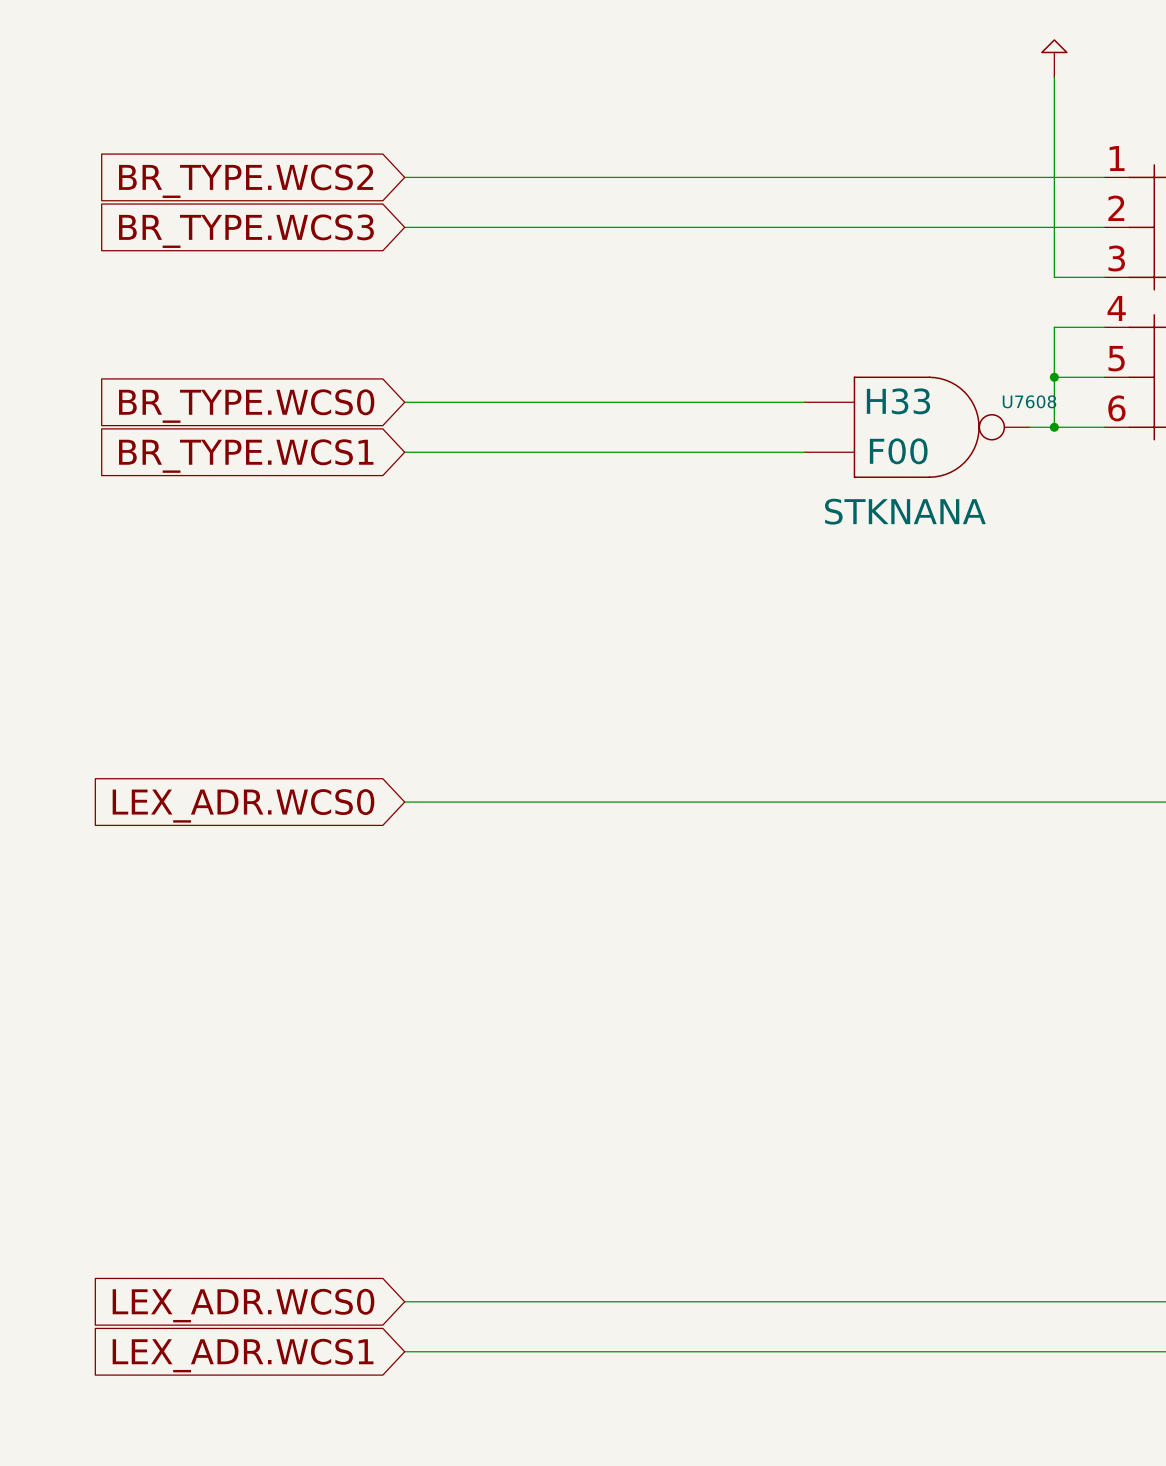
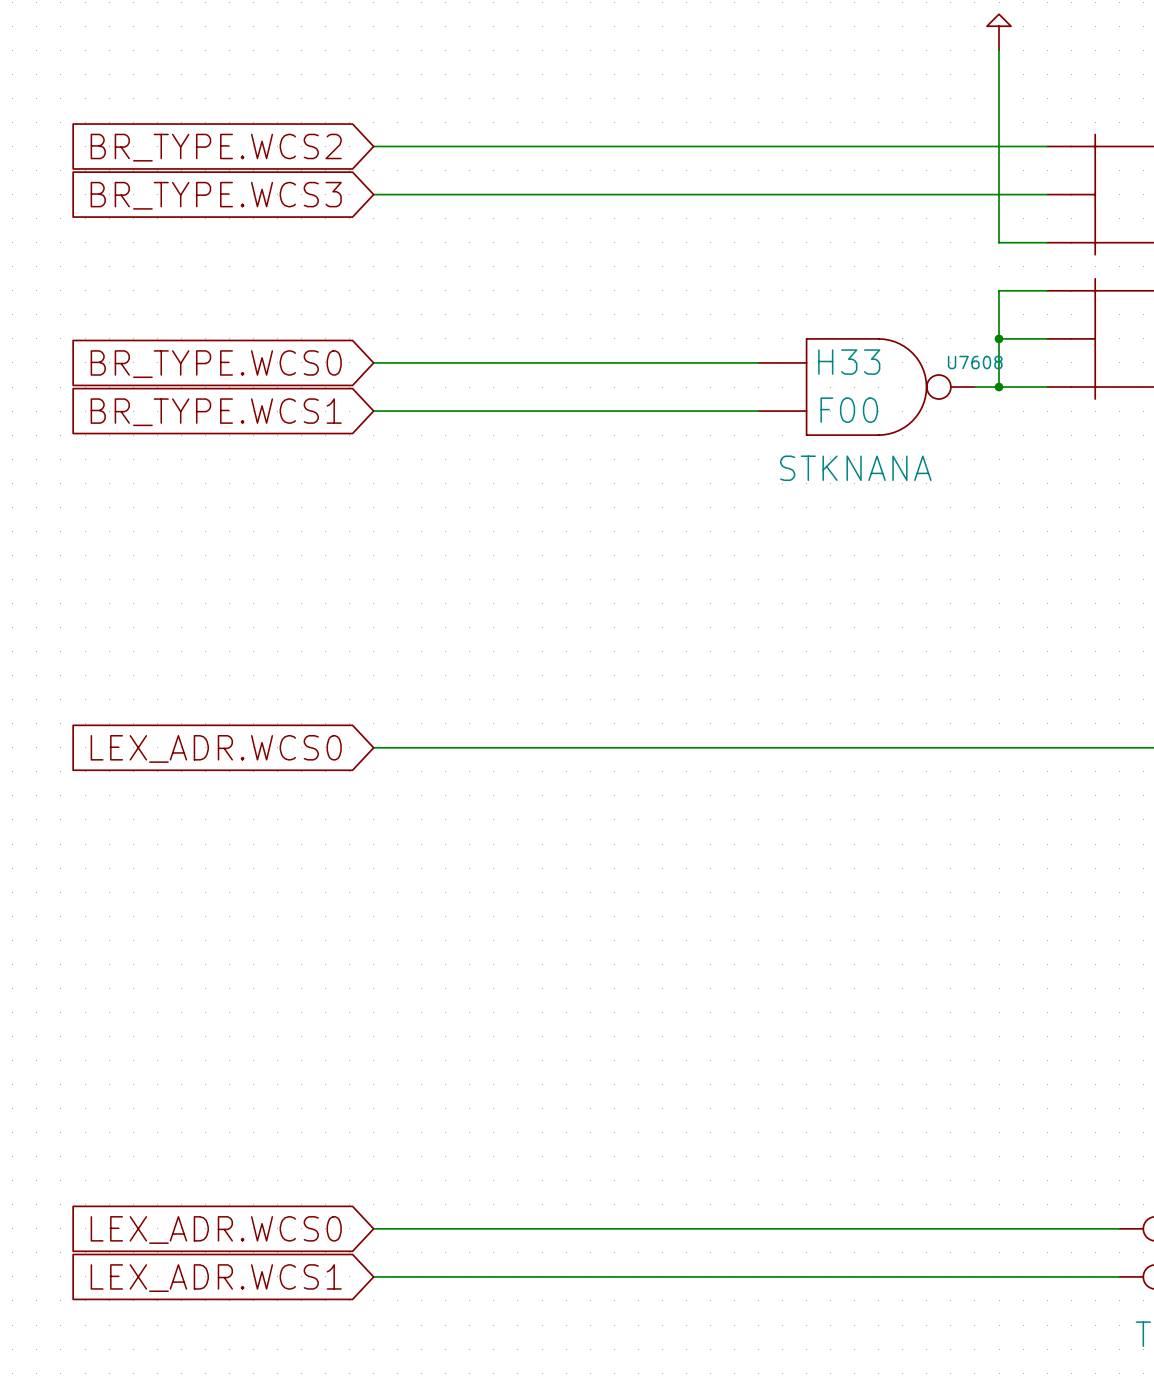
part pin number: 1 (1117, 158) -> none
part pin number: 2 (1116, 208) -> none
part pin number: 3 (1116, 258) -> none
part pin number: 4 (1116, 308) -> none
part pin number: 5 (1116, 358) -> none
part pin number: 6 (1116, 408) -> none

